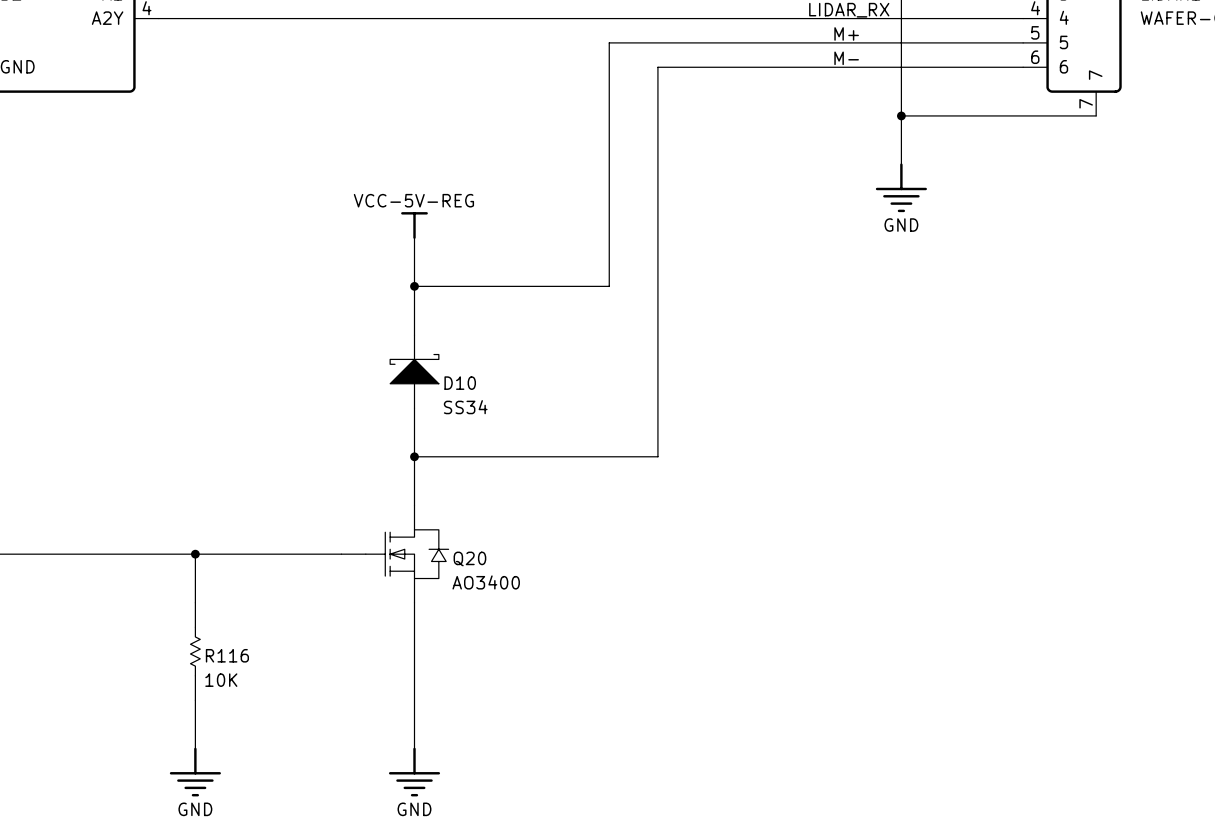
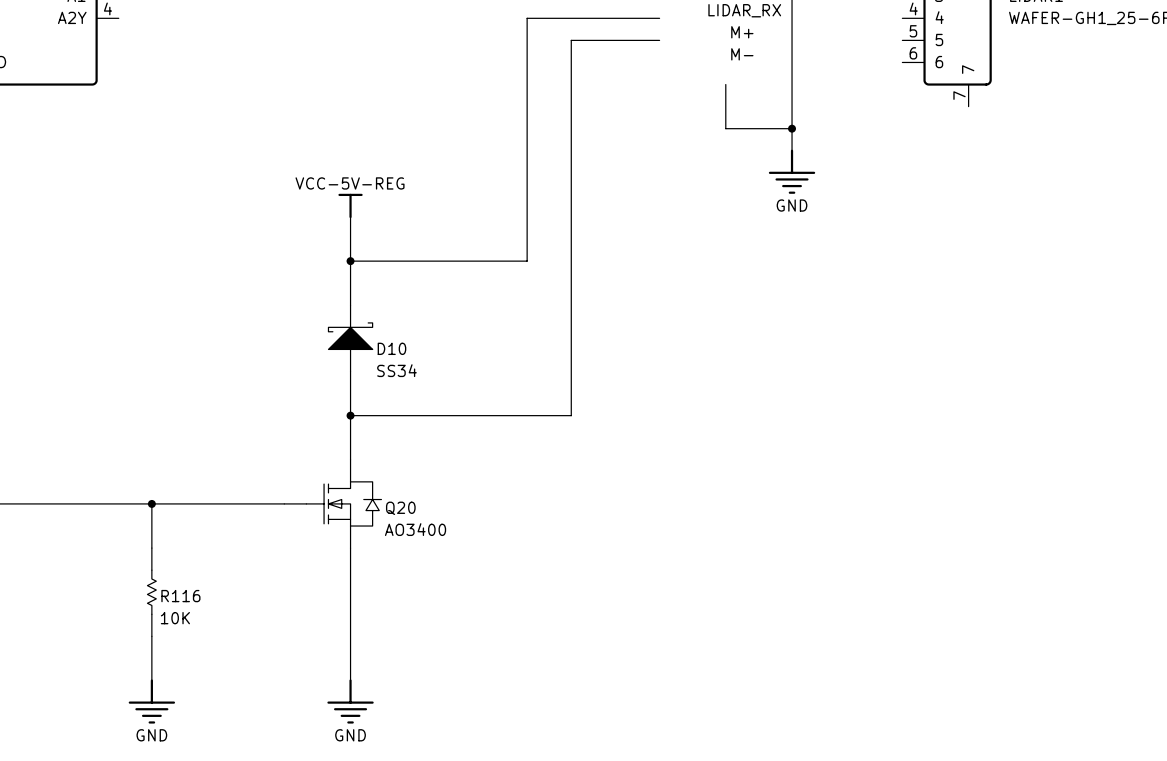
wire: (158, 18) (609, 18) -> none
wire: (755, 18) (1023, 18) -> none
wire: (609, 42) (657, 42) -> (527, 40) (527, 18)
wire: (755, 42) (1023, 42) -> none
wire: (657, 67) (1023, 67) -> (571, 62) (571, 40)
wire: none -> (725, 84) (725, 128) (792, 128)
wire: (901, 115) (1096, 115) -> none
junction position: (901, 115) -> (792, 128)

